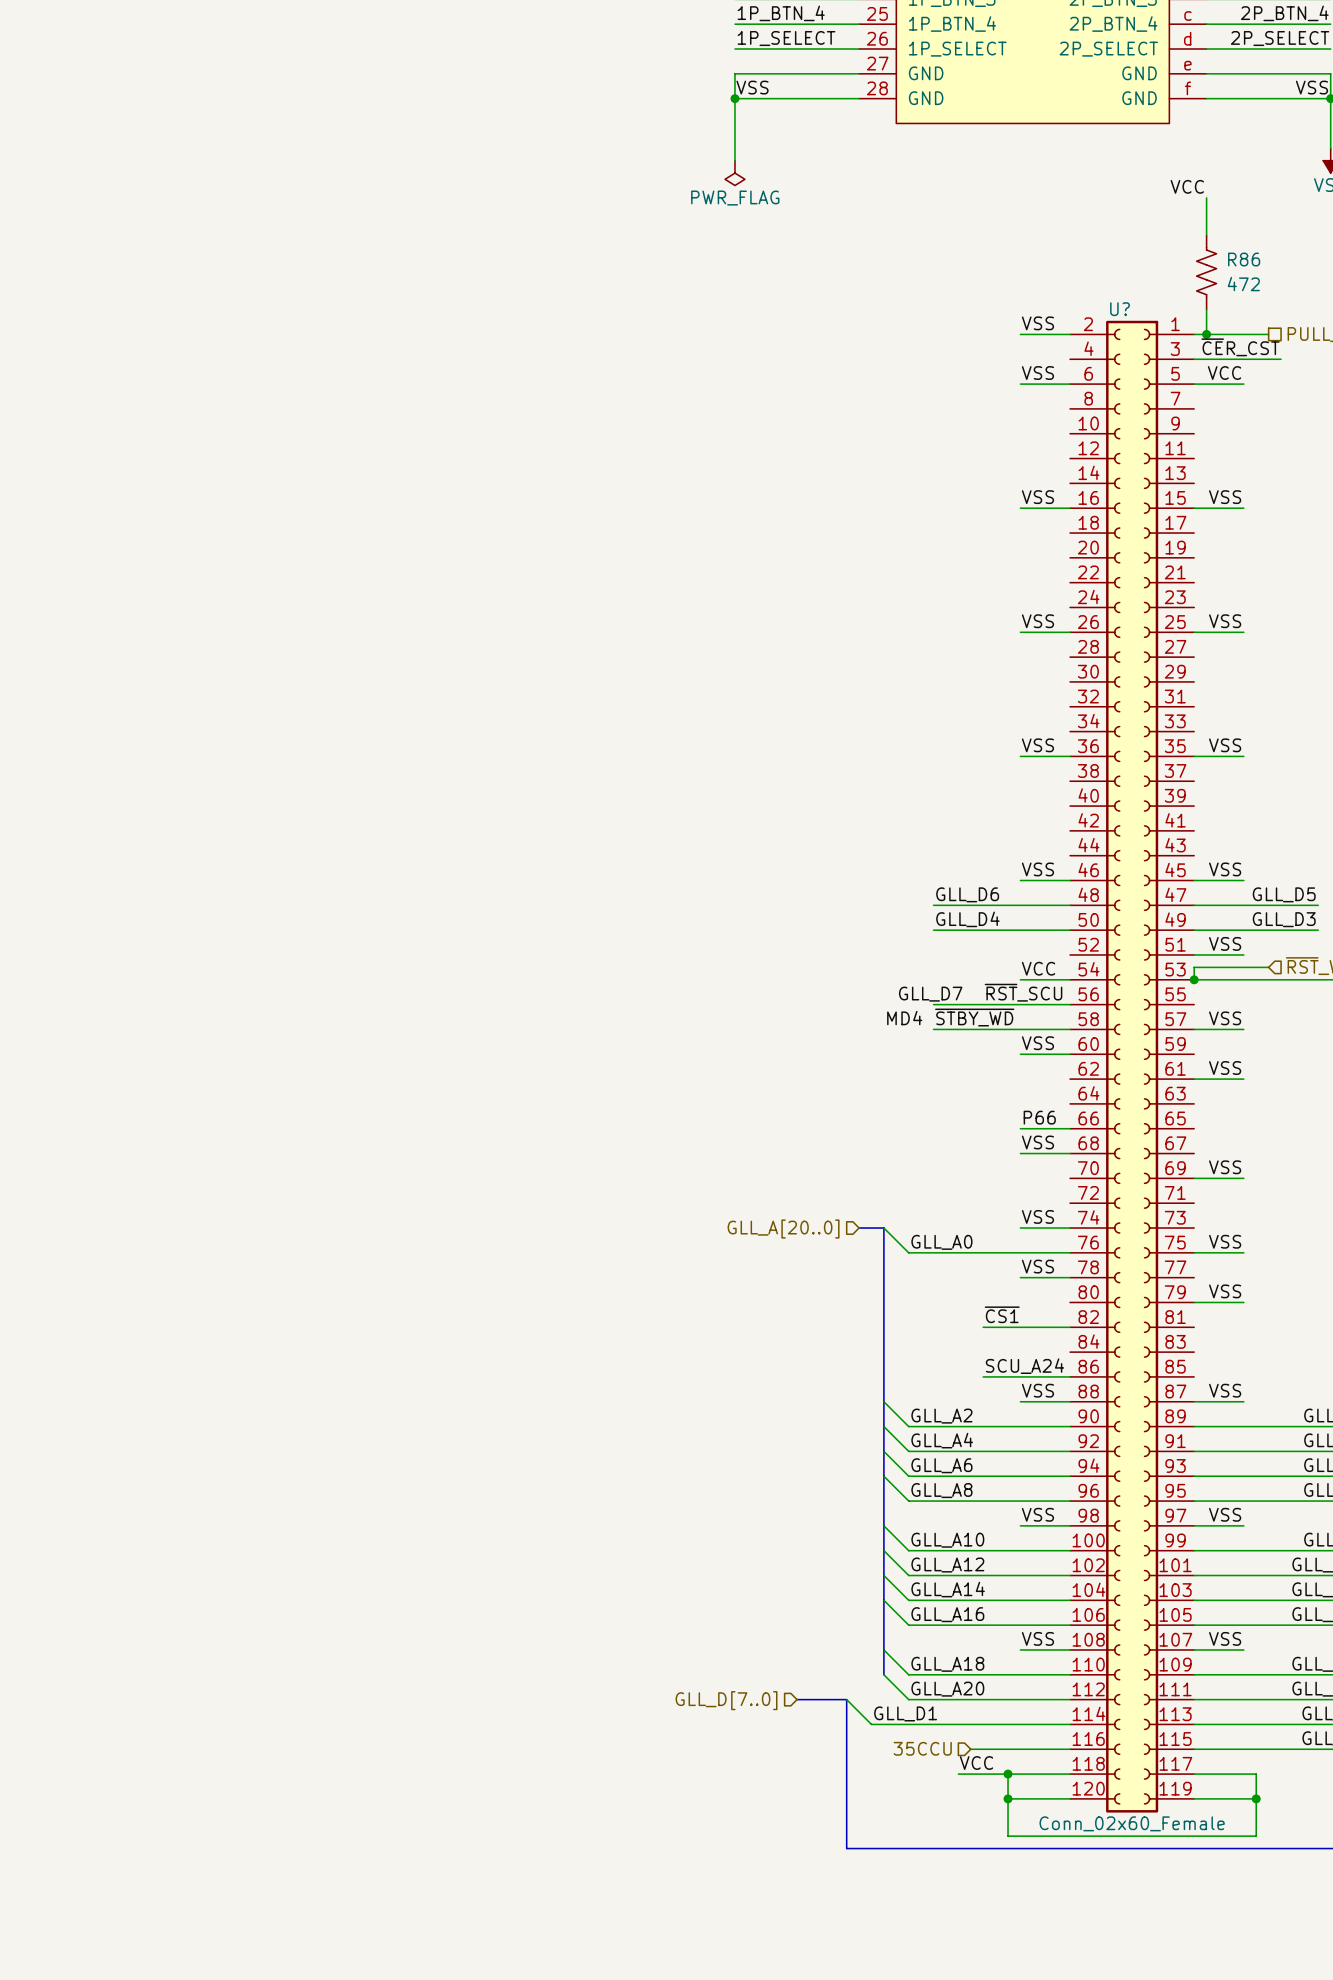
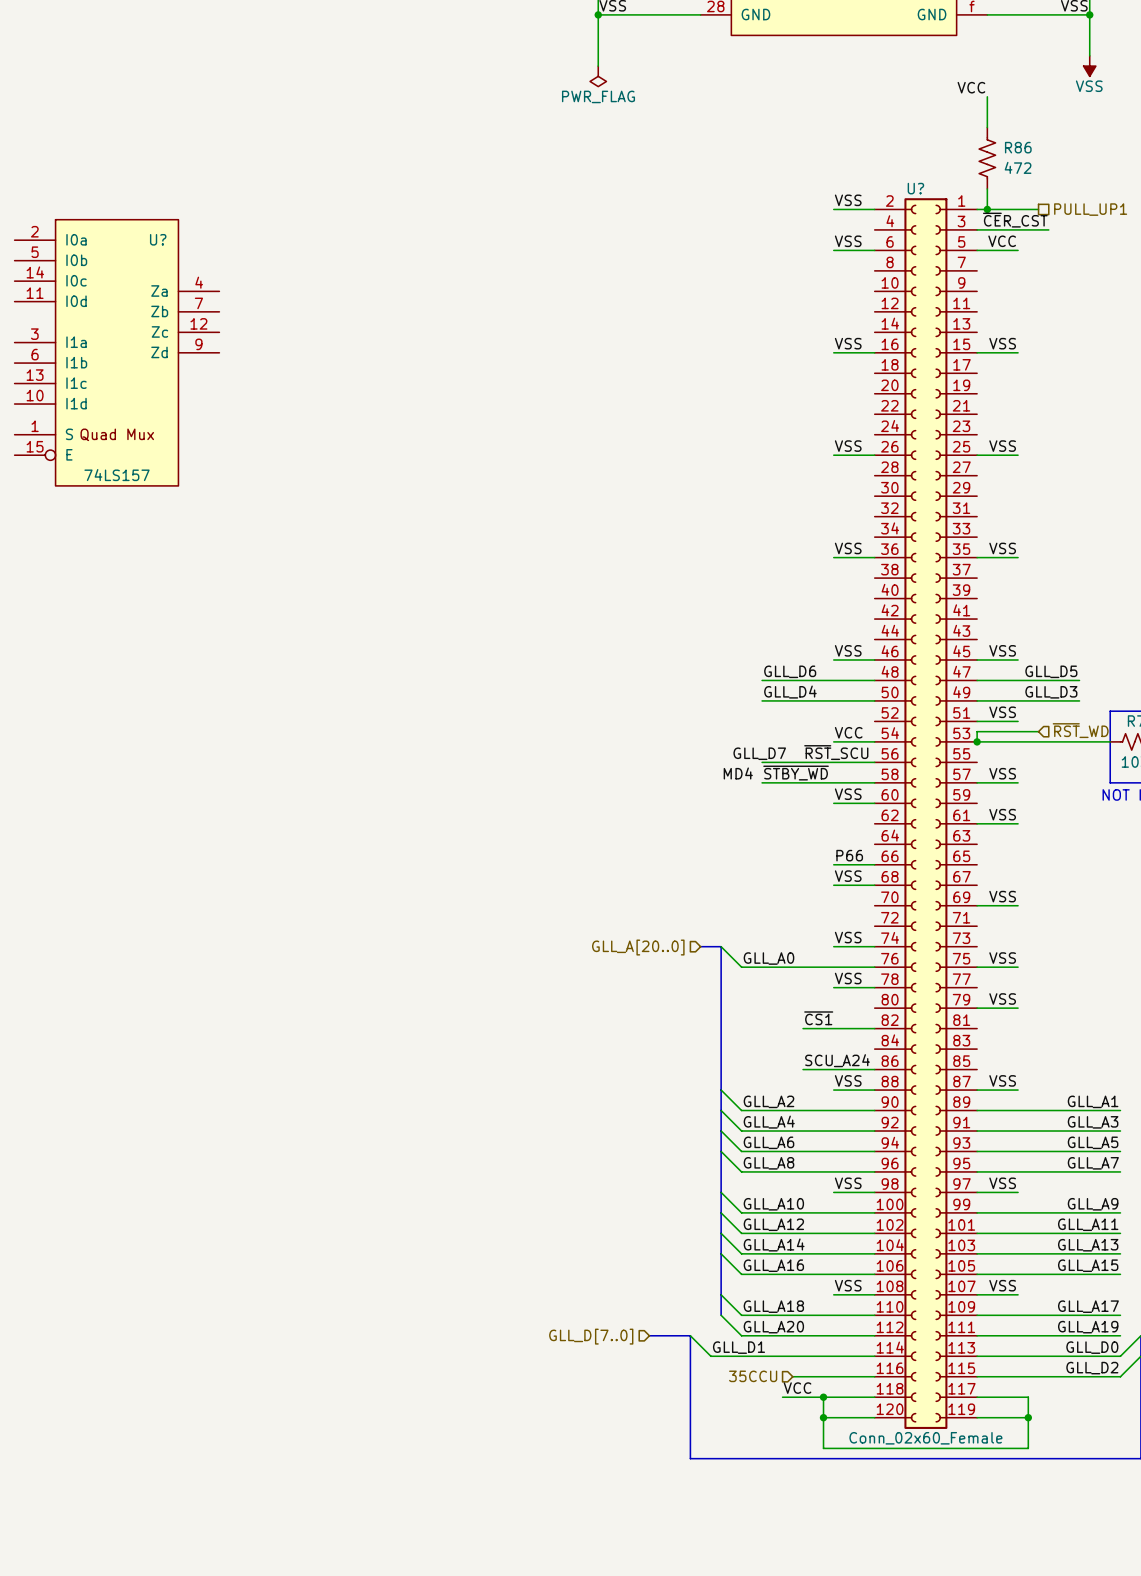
U?: none -> 74LS157 (117, 352)

